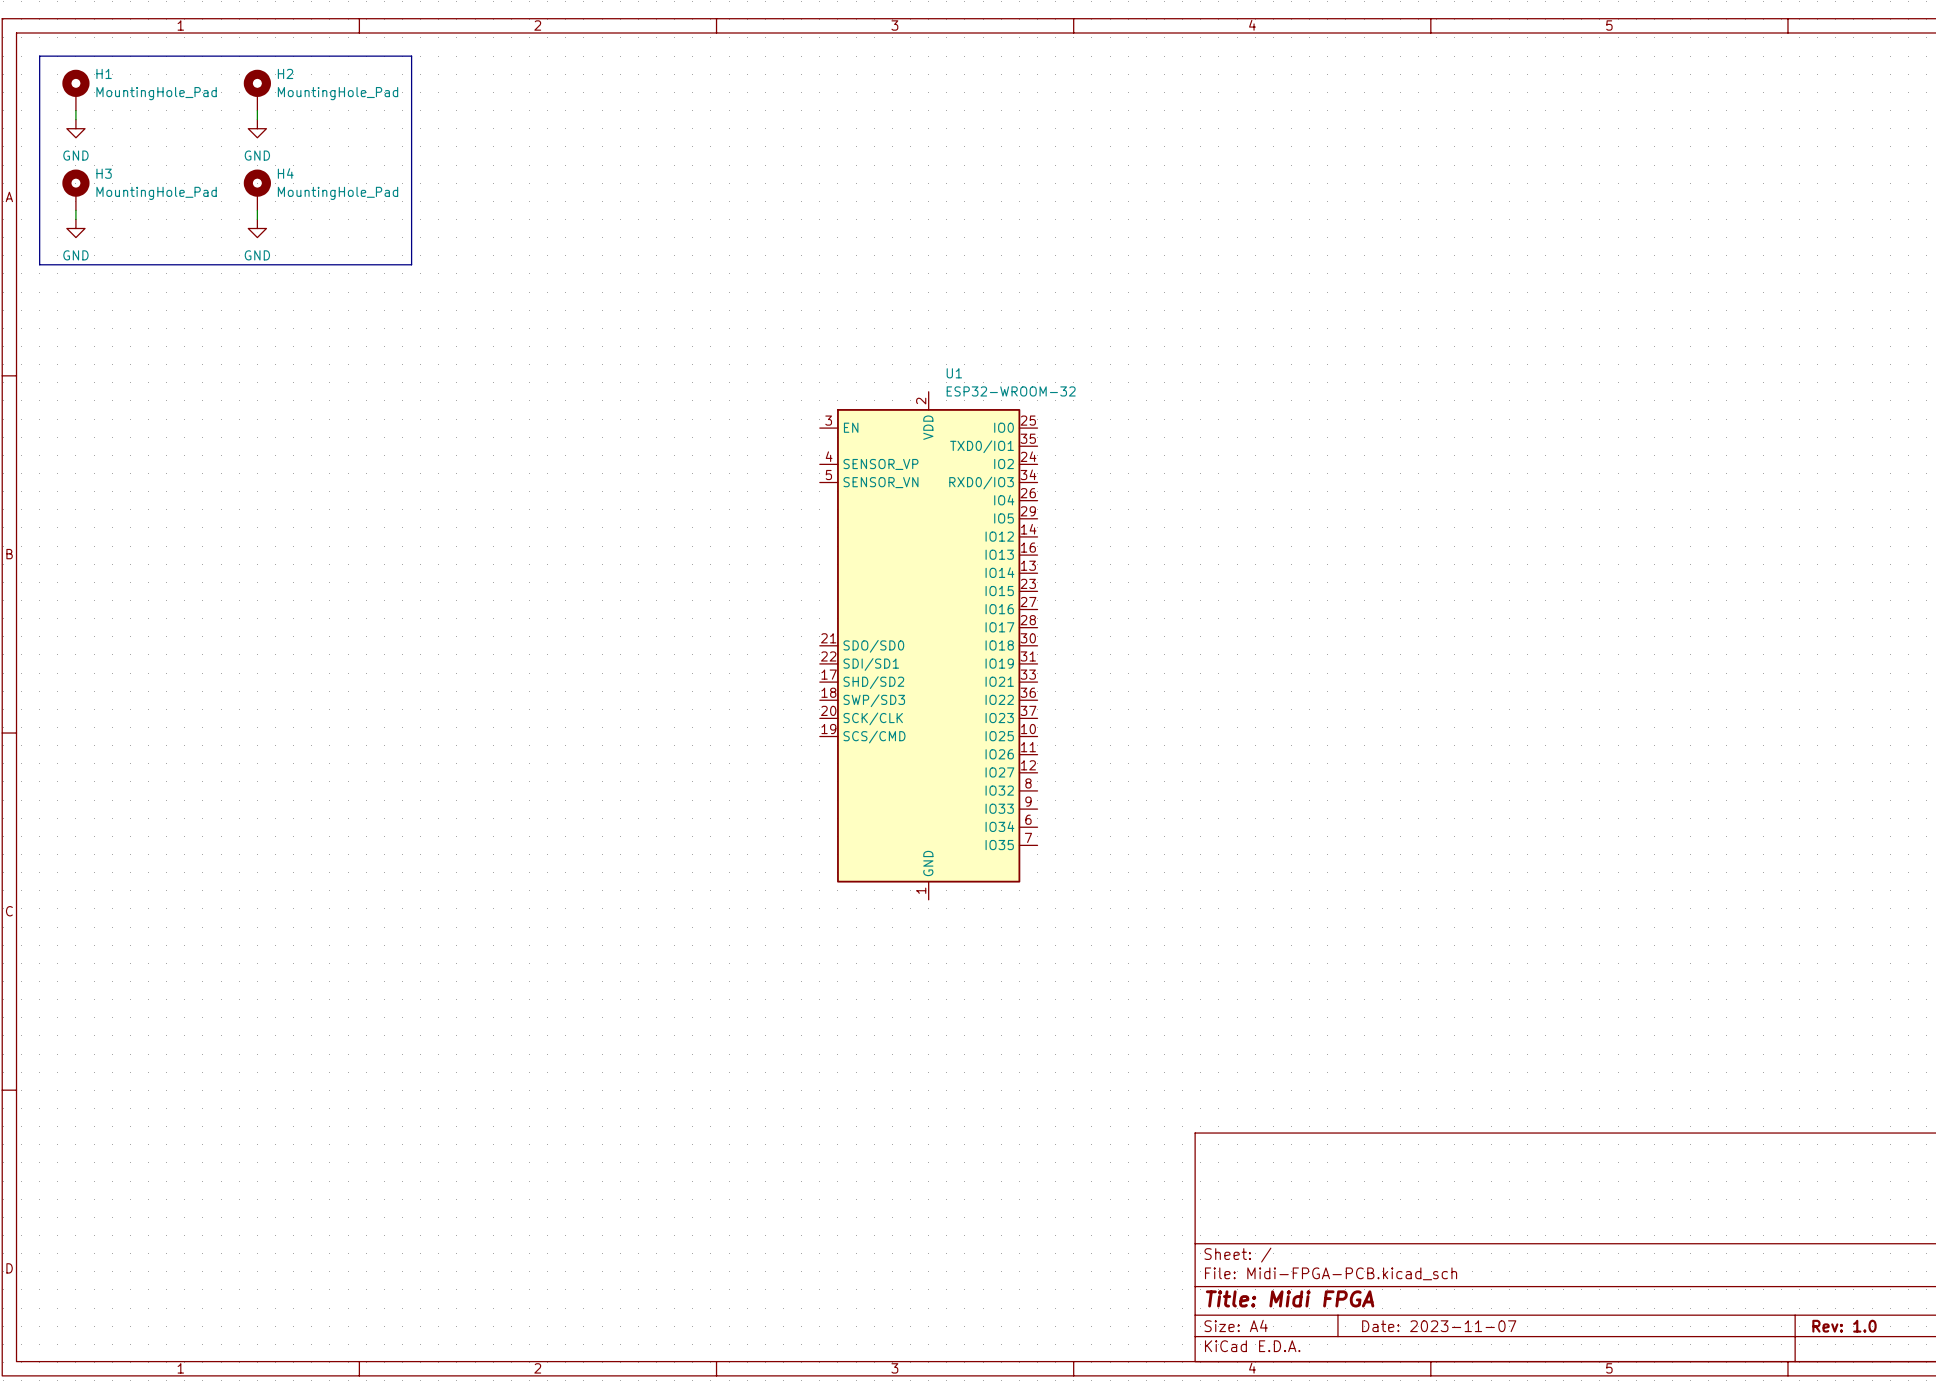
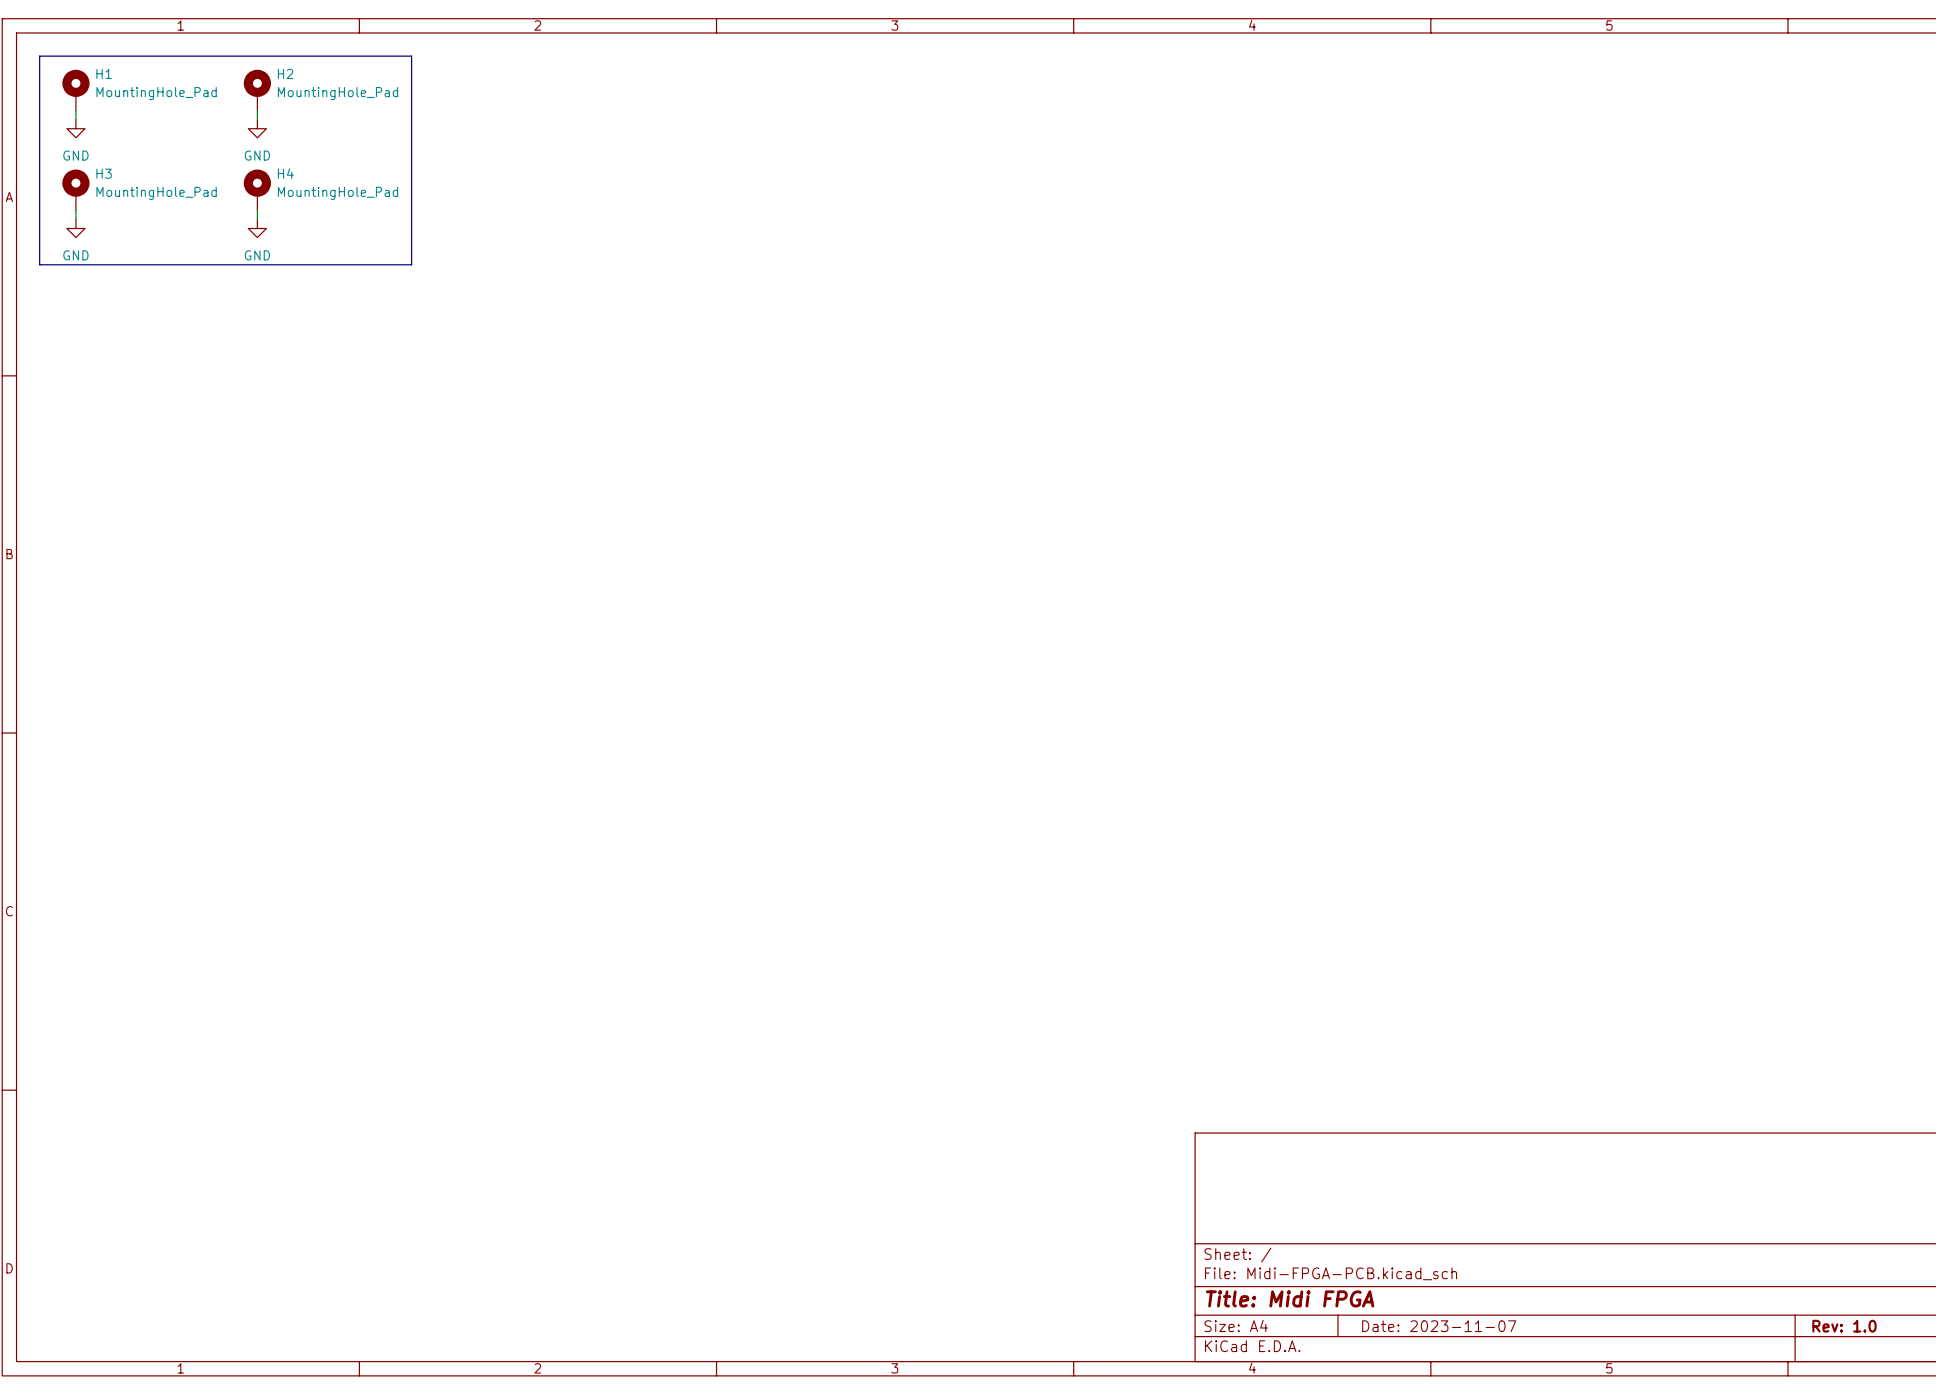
U1: ESP32-WROOM-32 (928, 645) -> none

